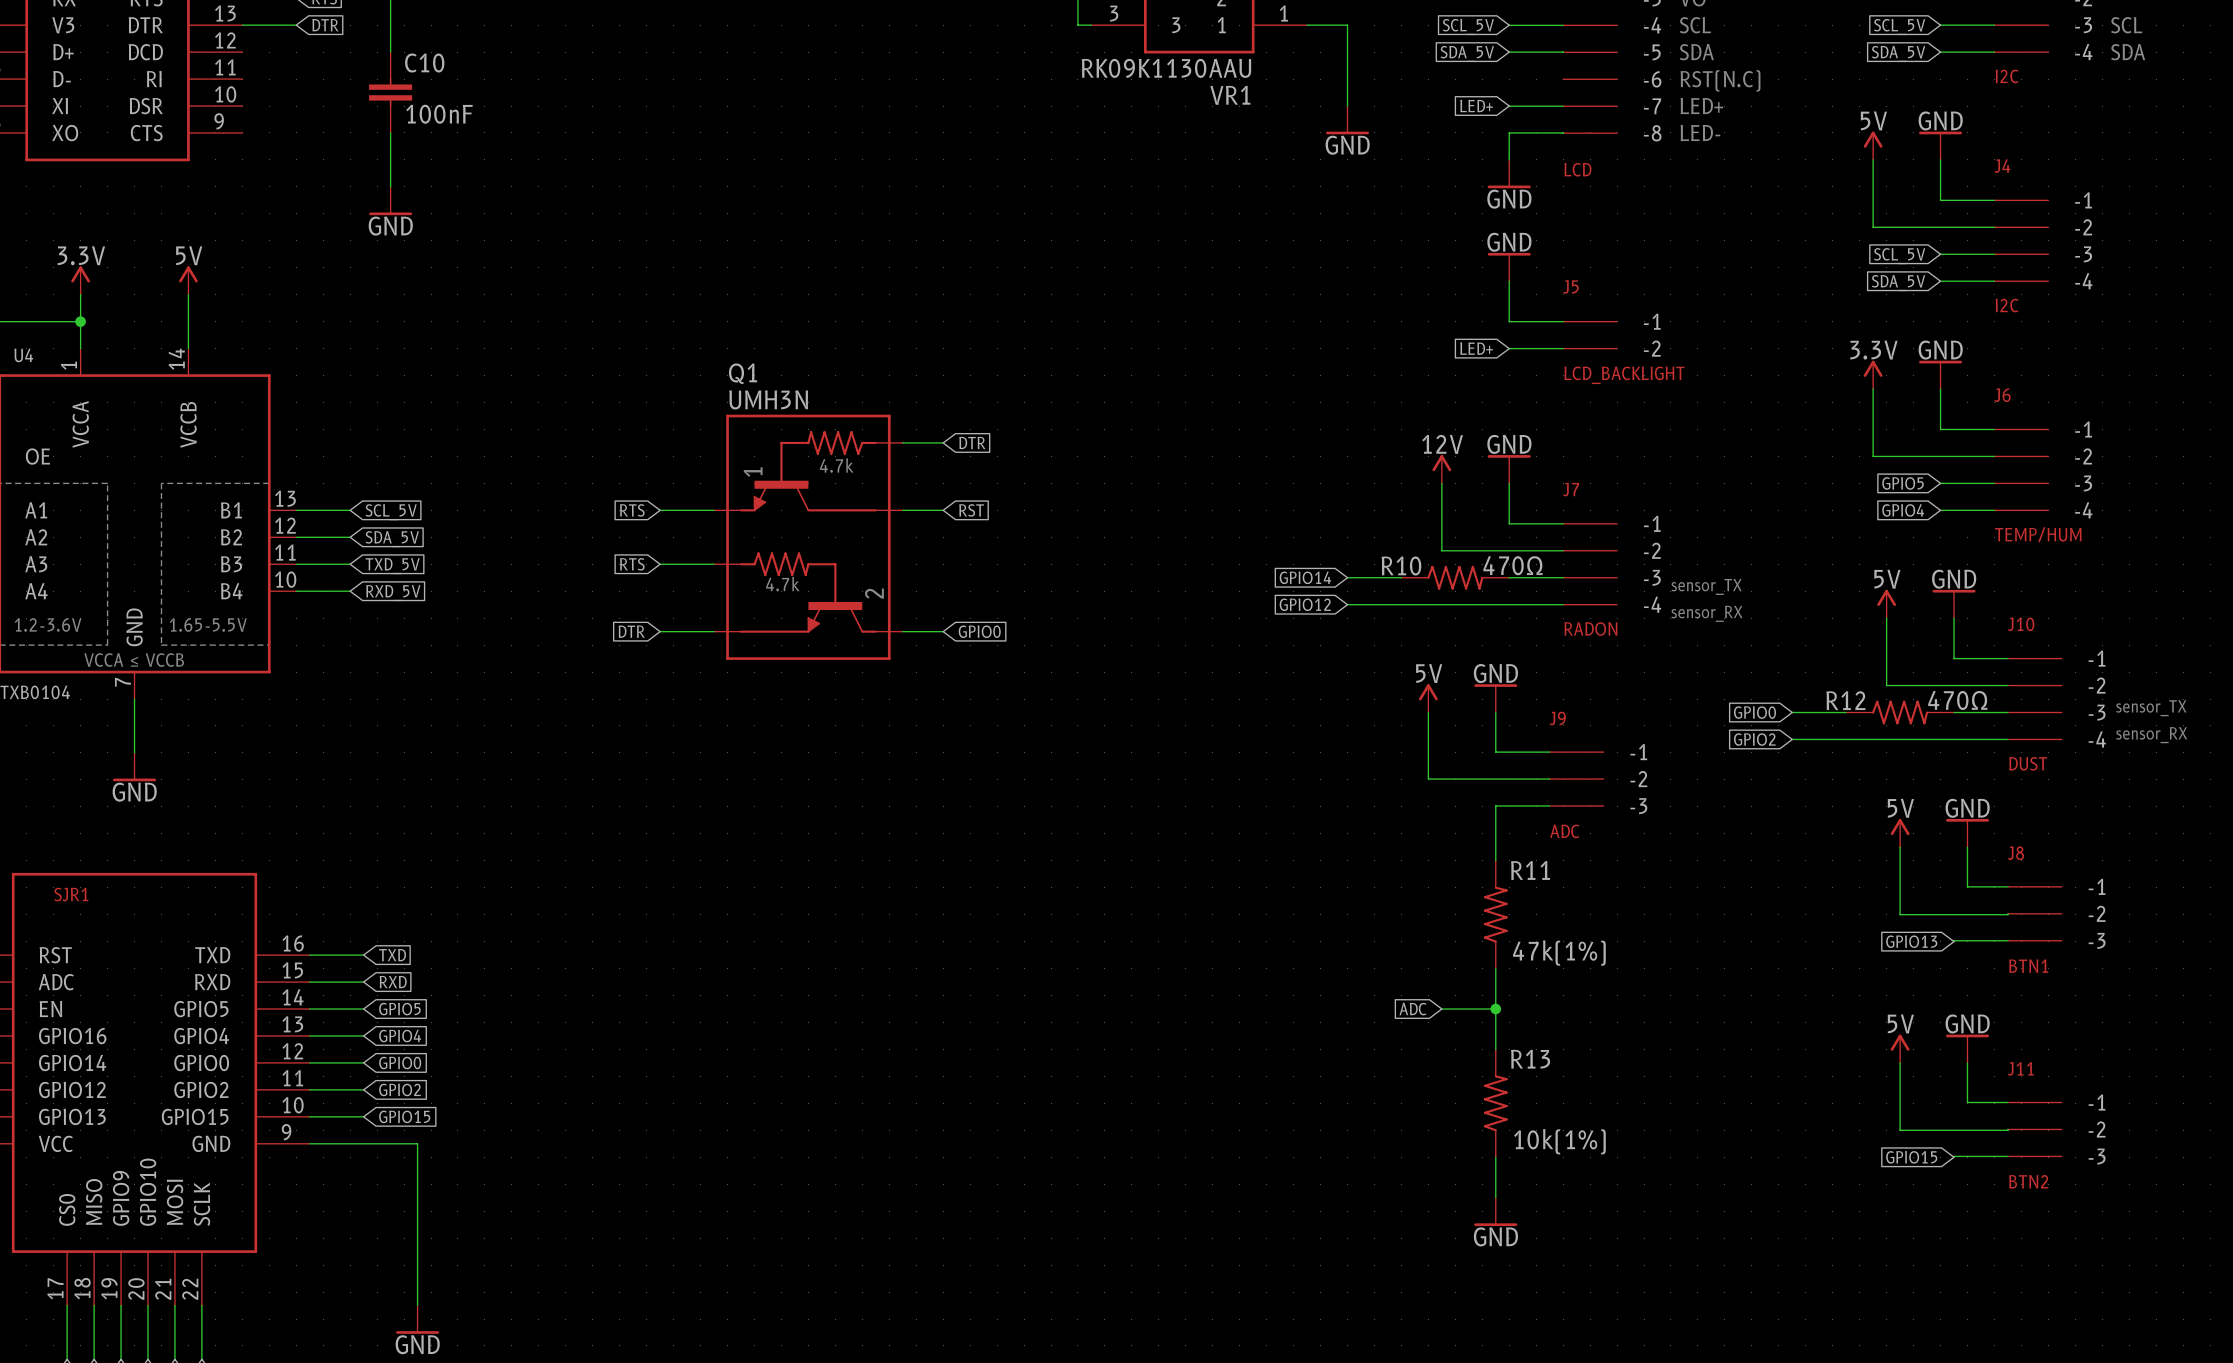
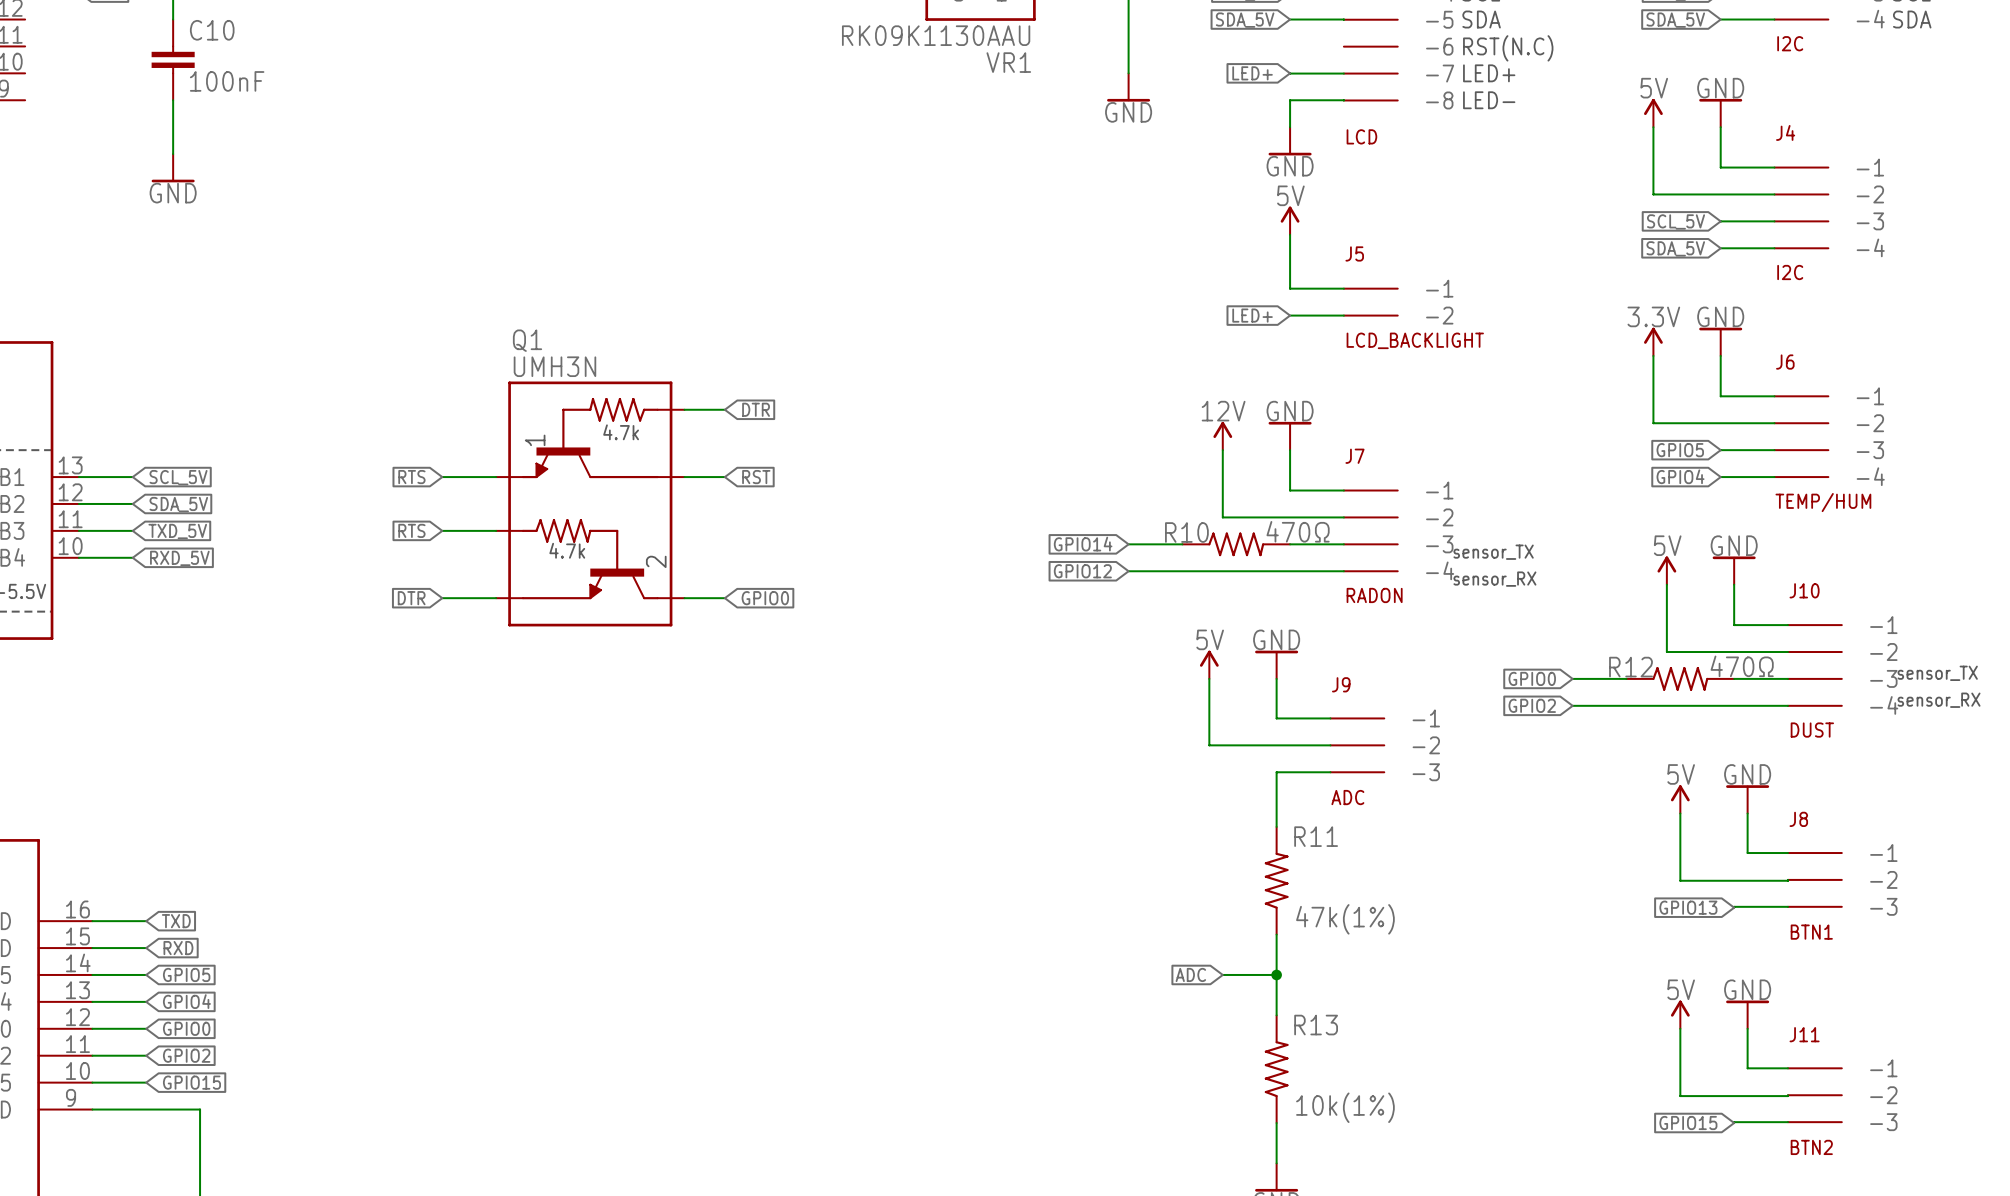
power symbol: none -> 5V (1290, 220)
power symbol: GND (1509, 267) -> none

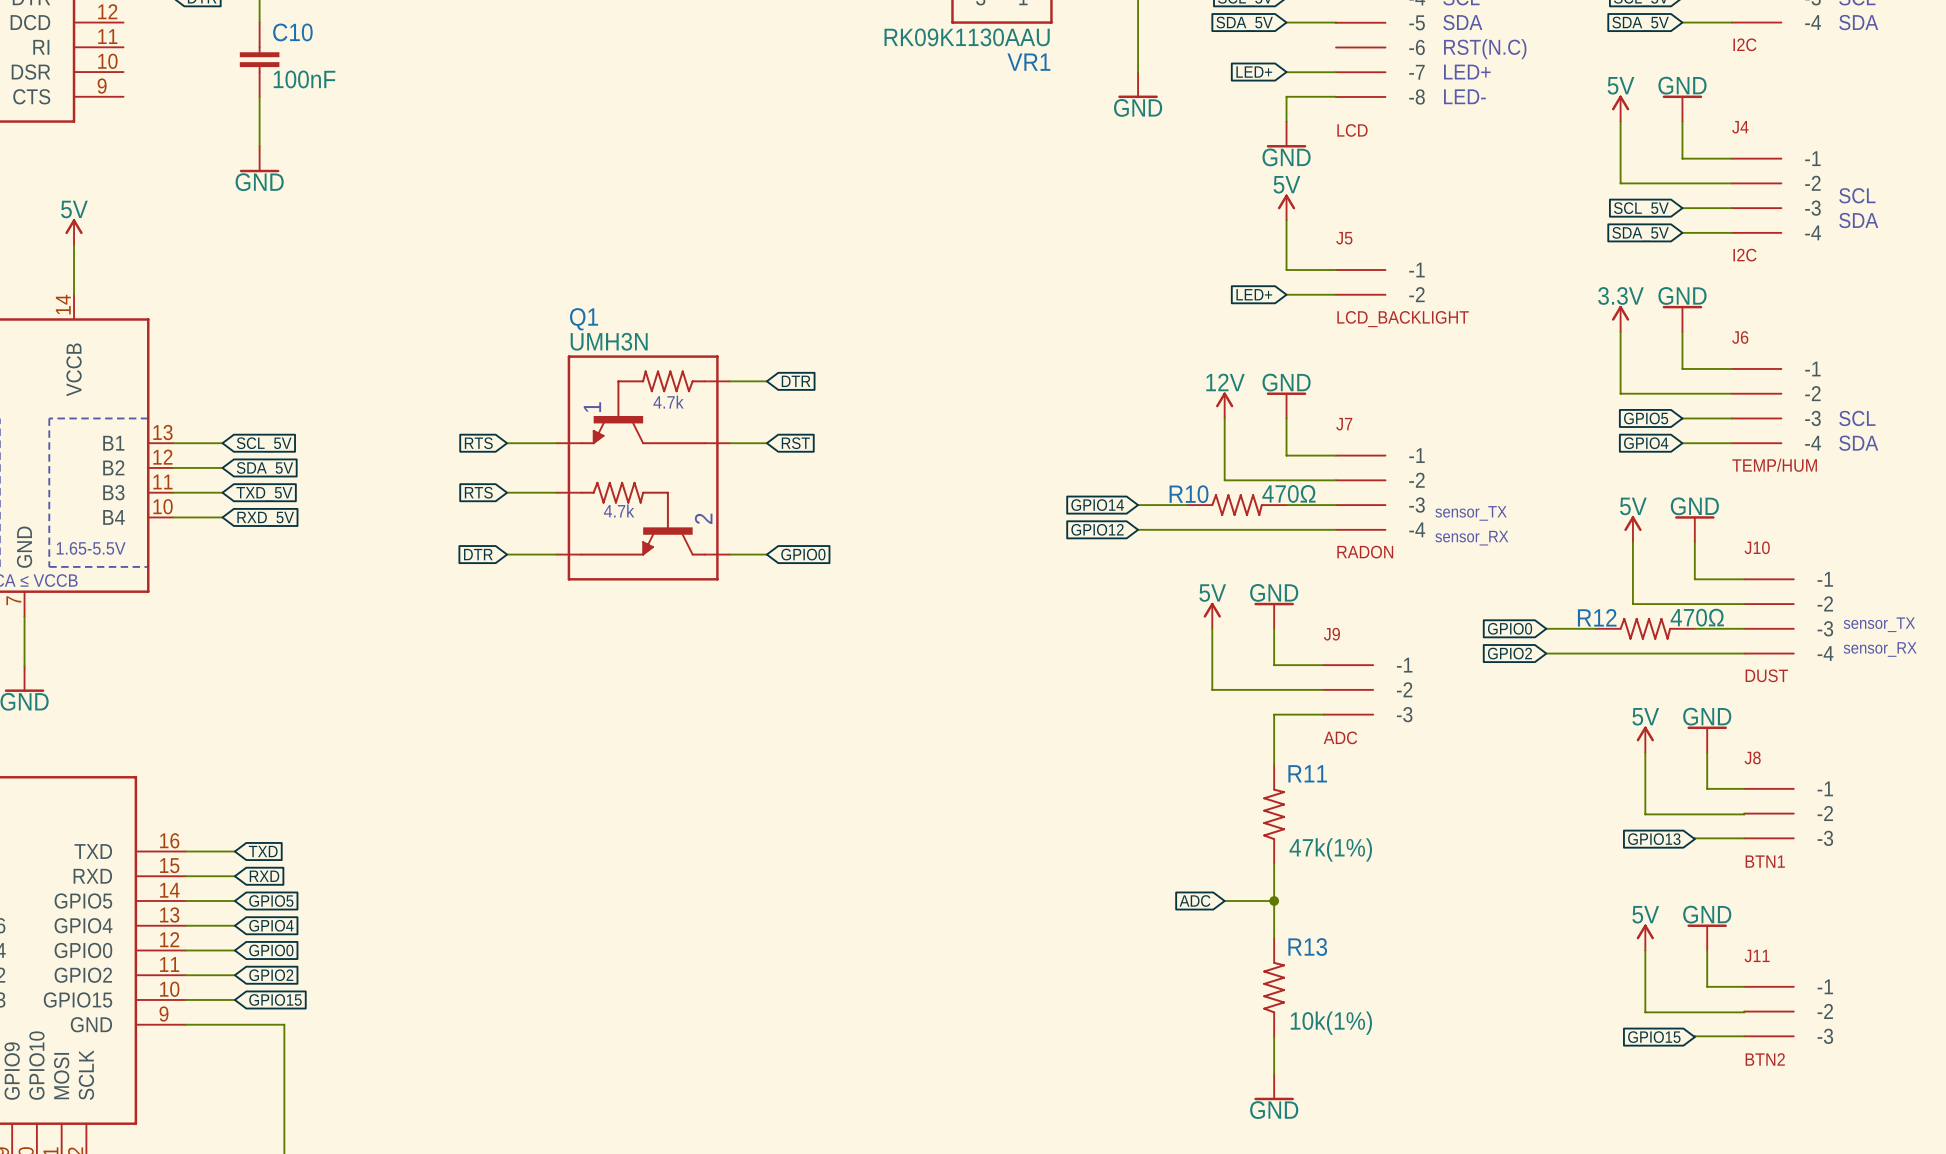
text: none -> SCL (1857, 195)
text: none -> SDA (1858, 220)
text: none -> SCL (1857, 418)
text: none -> SDA (1858, 443)

